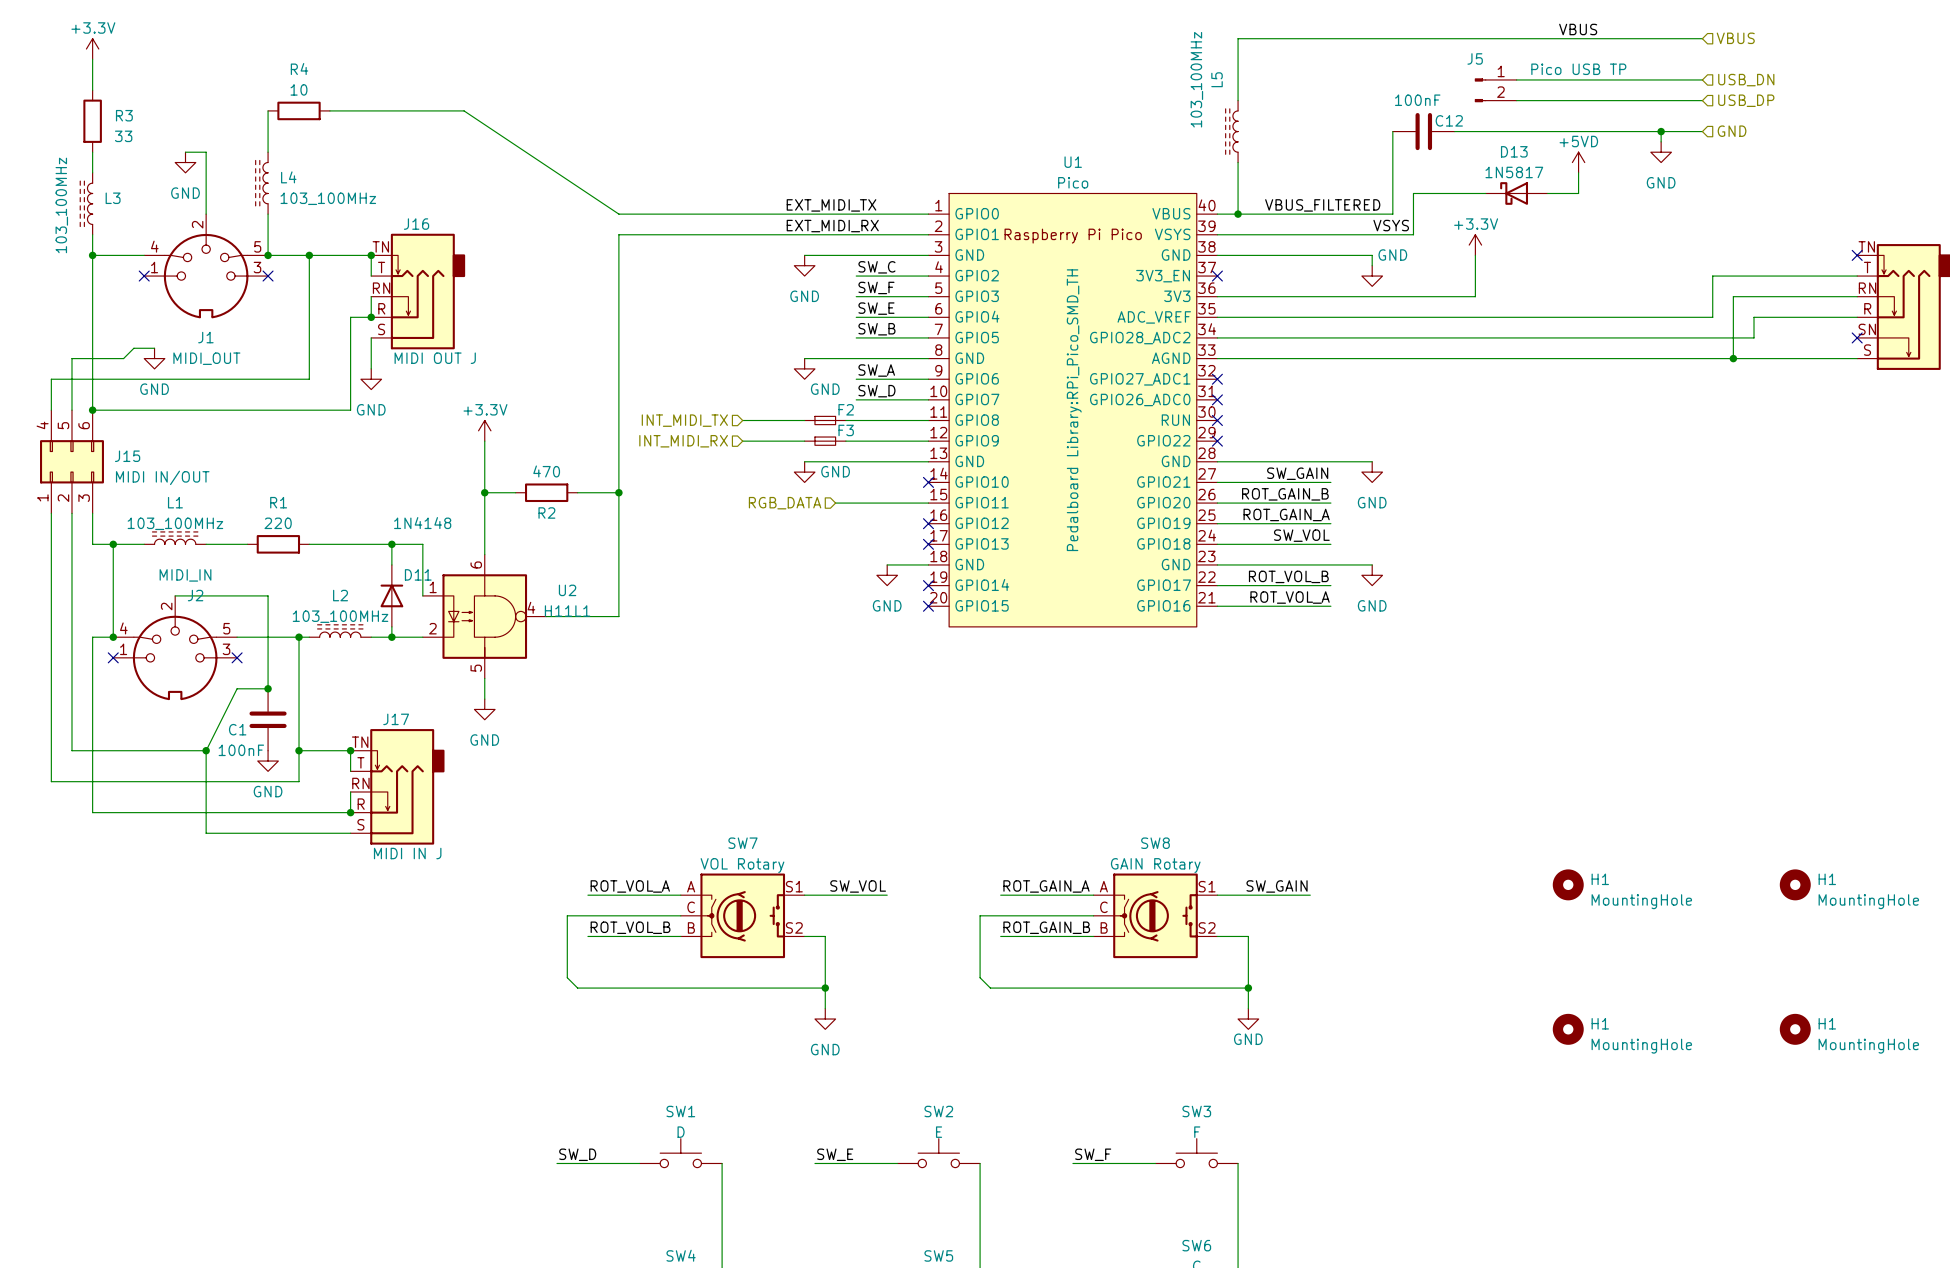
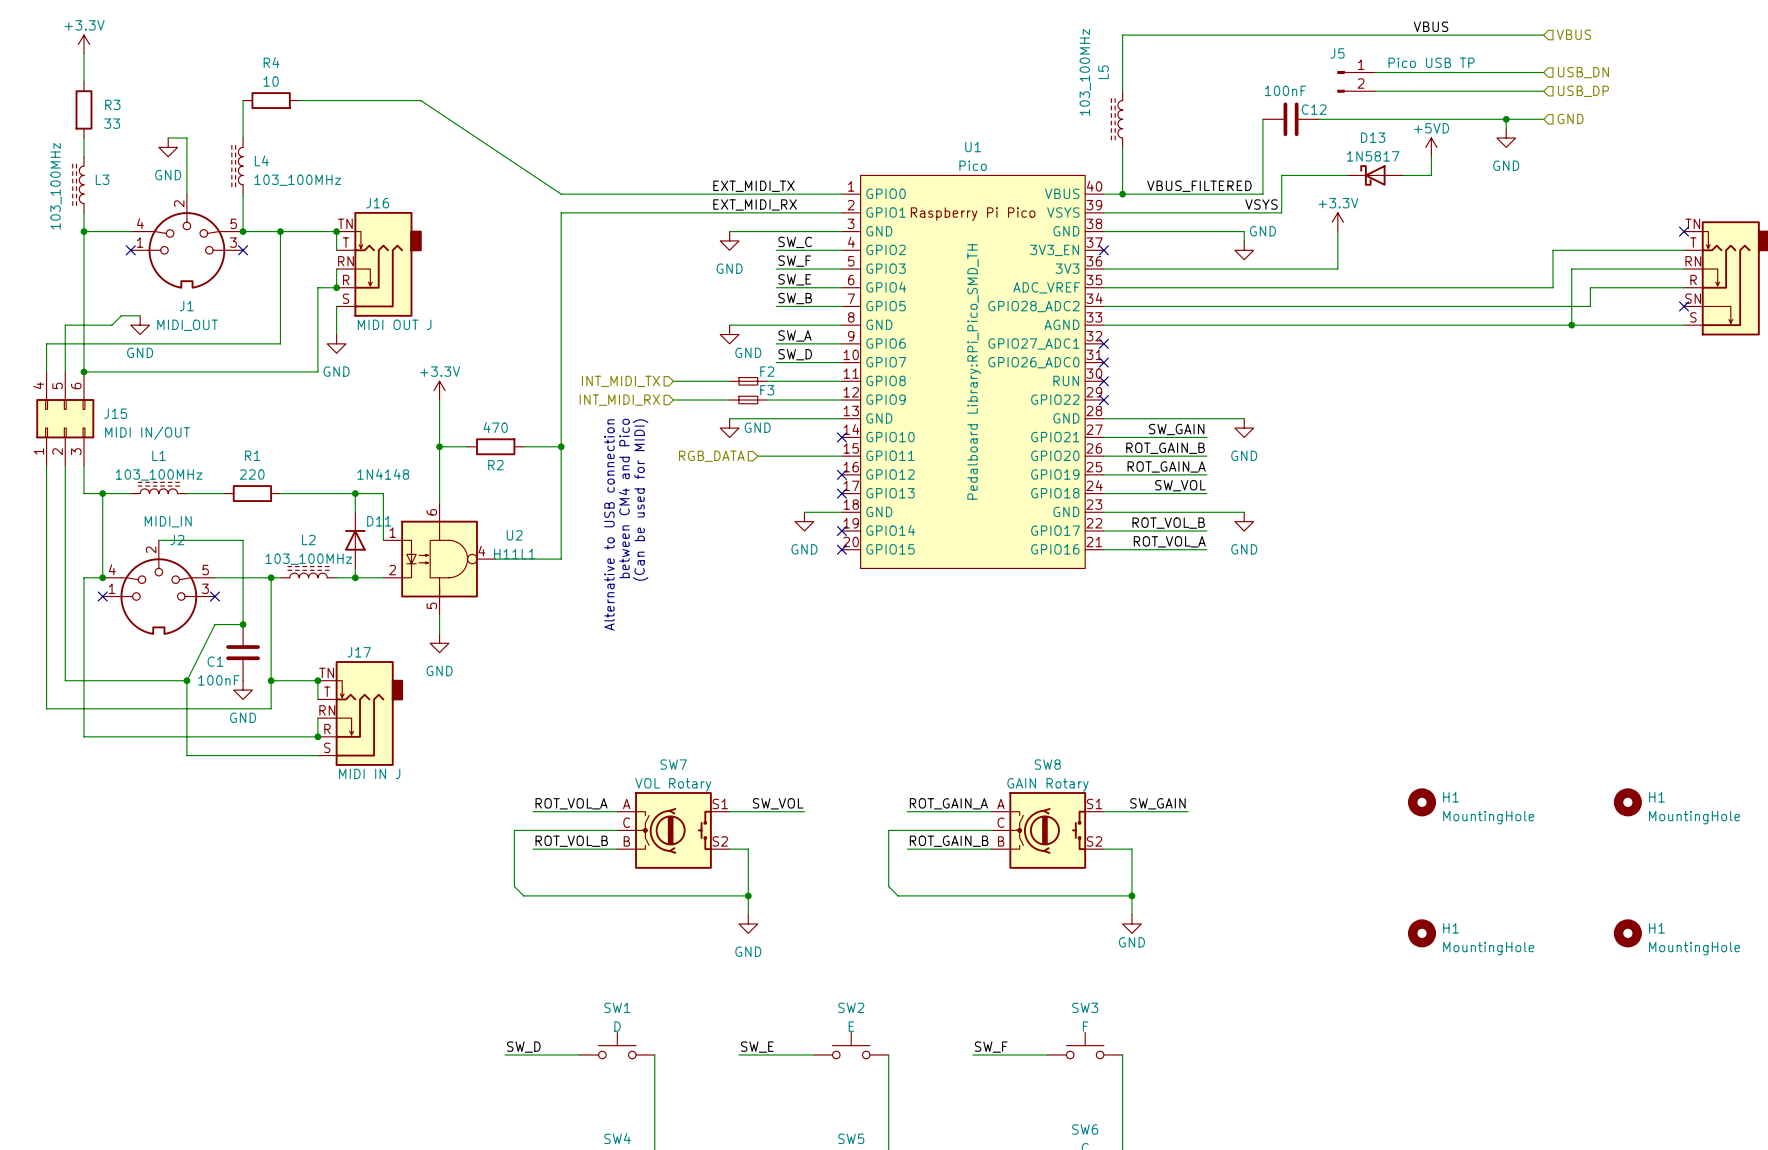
text: none -> between CM4 and Pico (624, 498)
text: none -> (Can be used for MIDI) (640, 500)
text: none -> Alternative to USB connection (609, 525)

